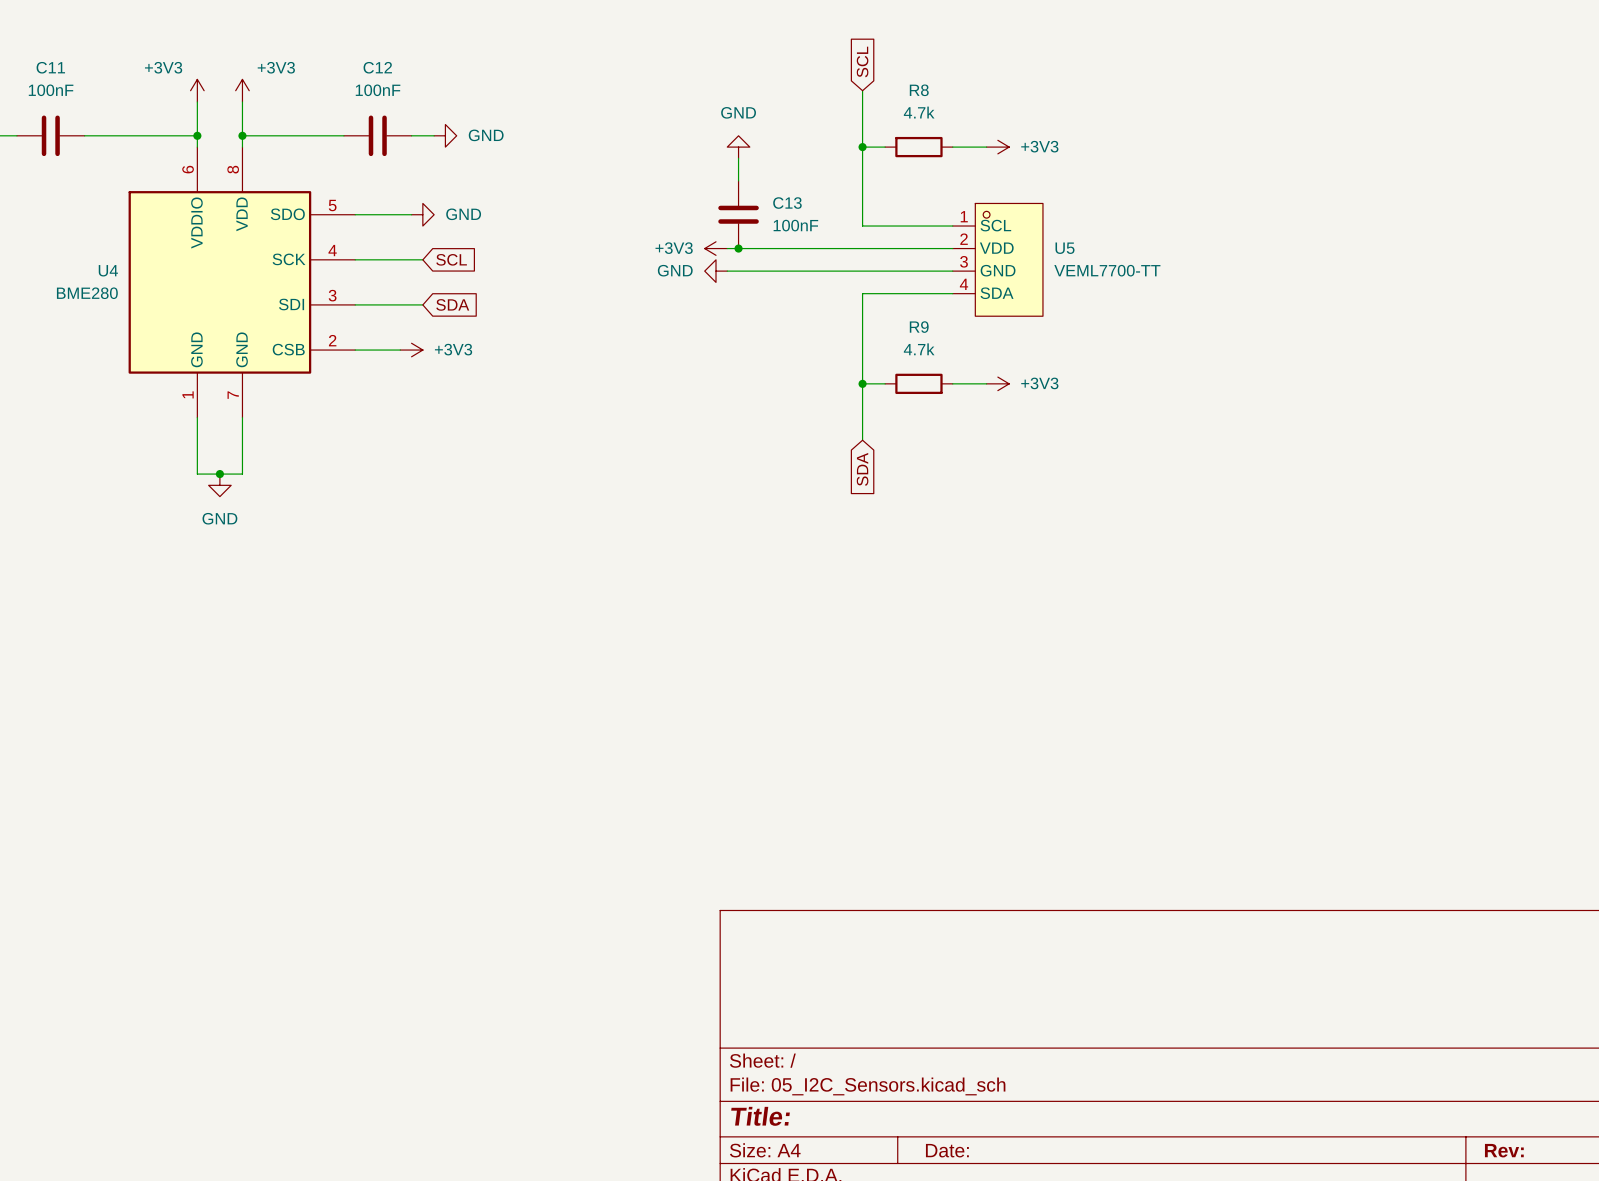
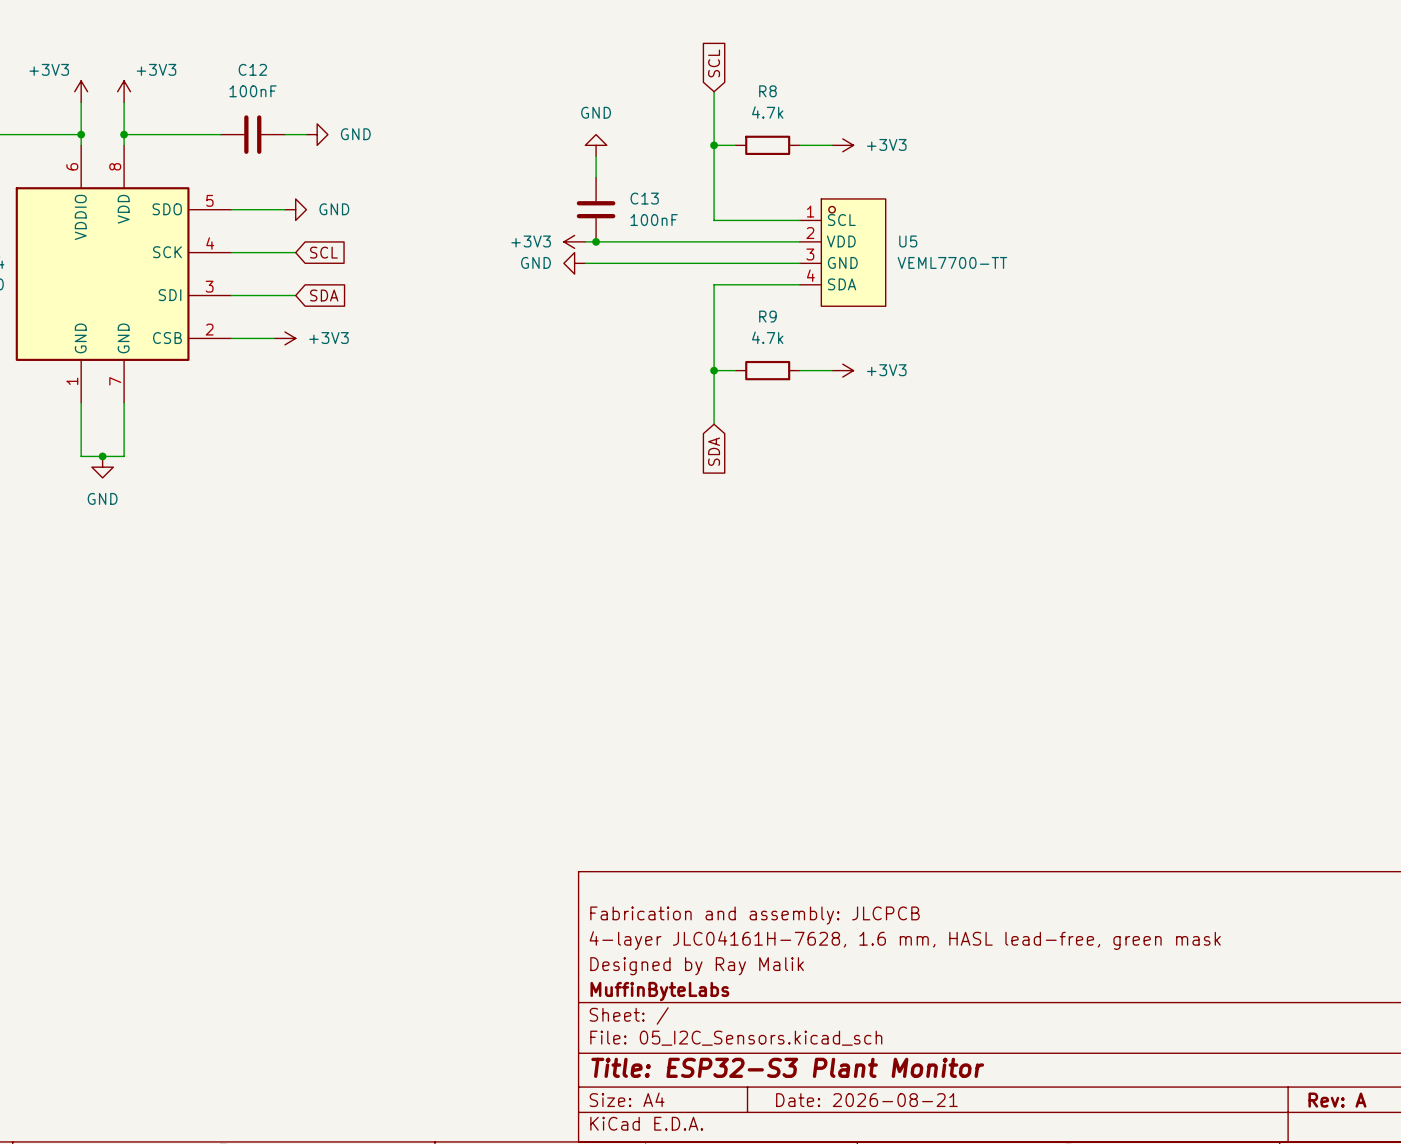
title block: none -> Fabrication and assembly: JLCPCB (755, 915)
title block: none -> 4-layer JLC04161H-7628, 1.6 mm, HASL lead-free, green mask (905, 940)
title block: none -> Designed by Ray Malik (697, 966)
title block: none -> MuffinByteLabs (659, 991)
title block: Title: (760, 1116) -> Title: ESP32-S3 Plant Monitor (787, 1067)
title block: Date: (947, 1150) -> Date: 2026-08-21 (866, 1100)
title block: Rev: (1504, 1150) -> Rev: A (1337, 1100)

